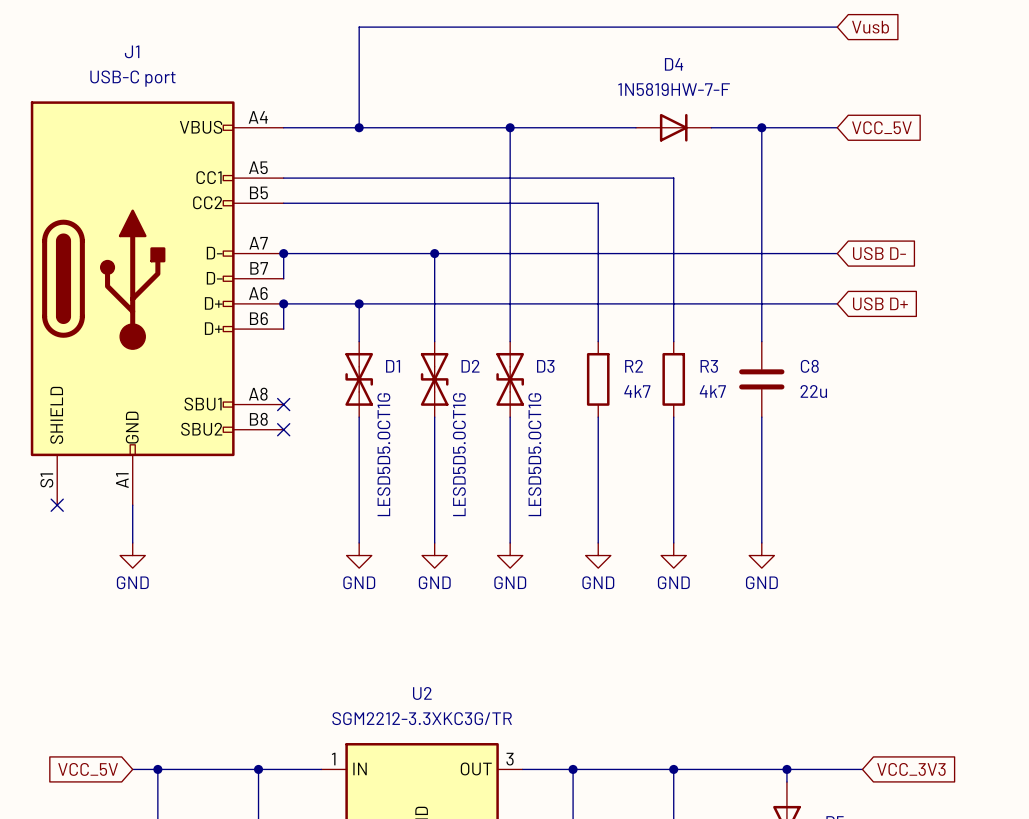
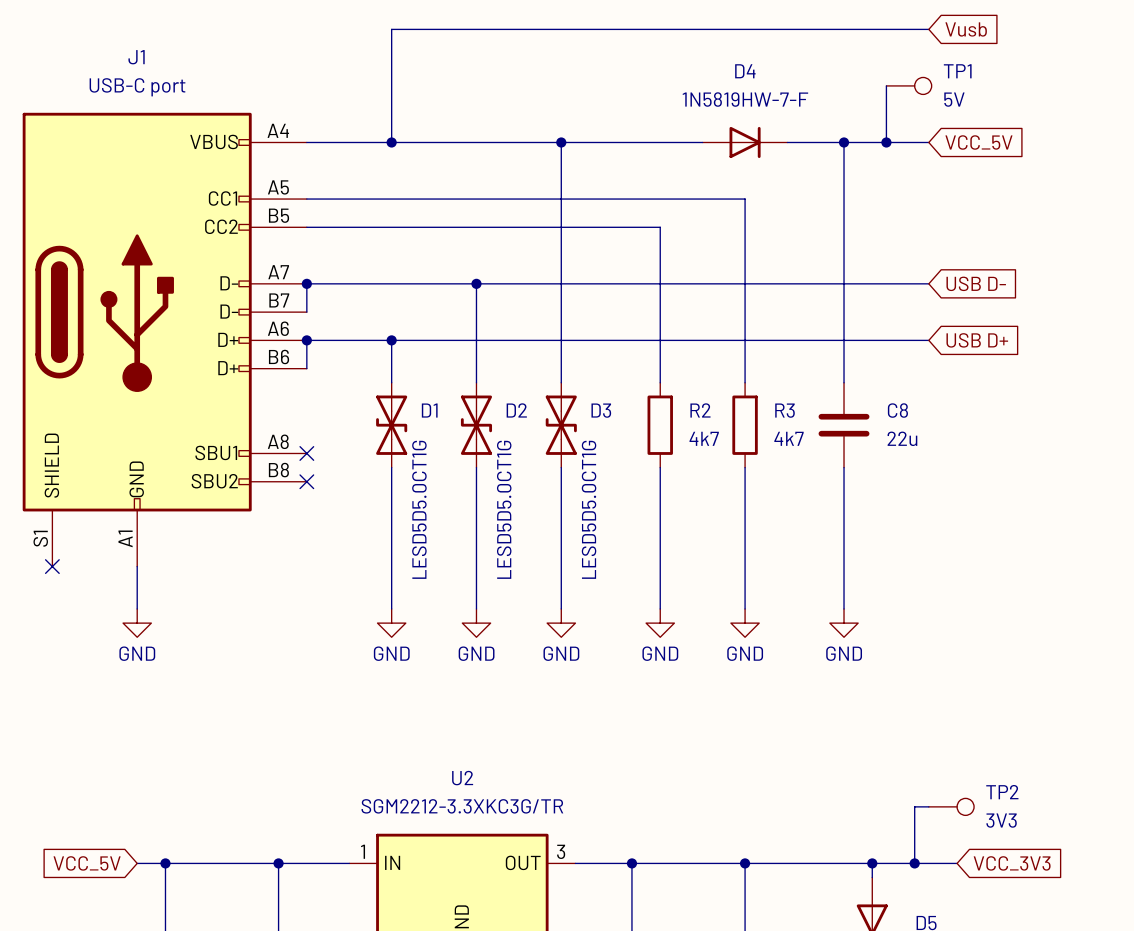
wire: none -> (886, 85) (886, 142)
TP1: none -> 5V (909, 85)
junction: none -> (886, 142)
wire: none -> (928, 806) (914, 806) (914, 863)
TP2: none -> 3V3 (951, 806)
junction: none -> (914, 863)

